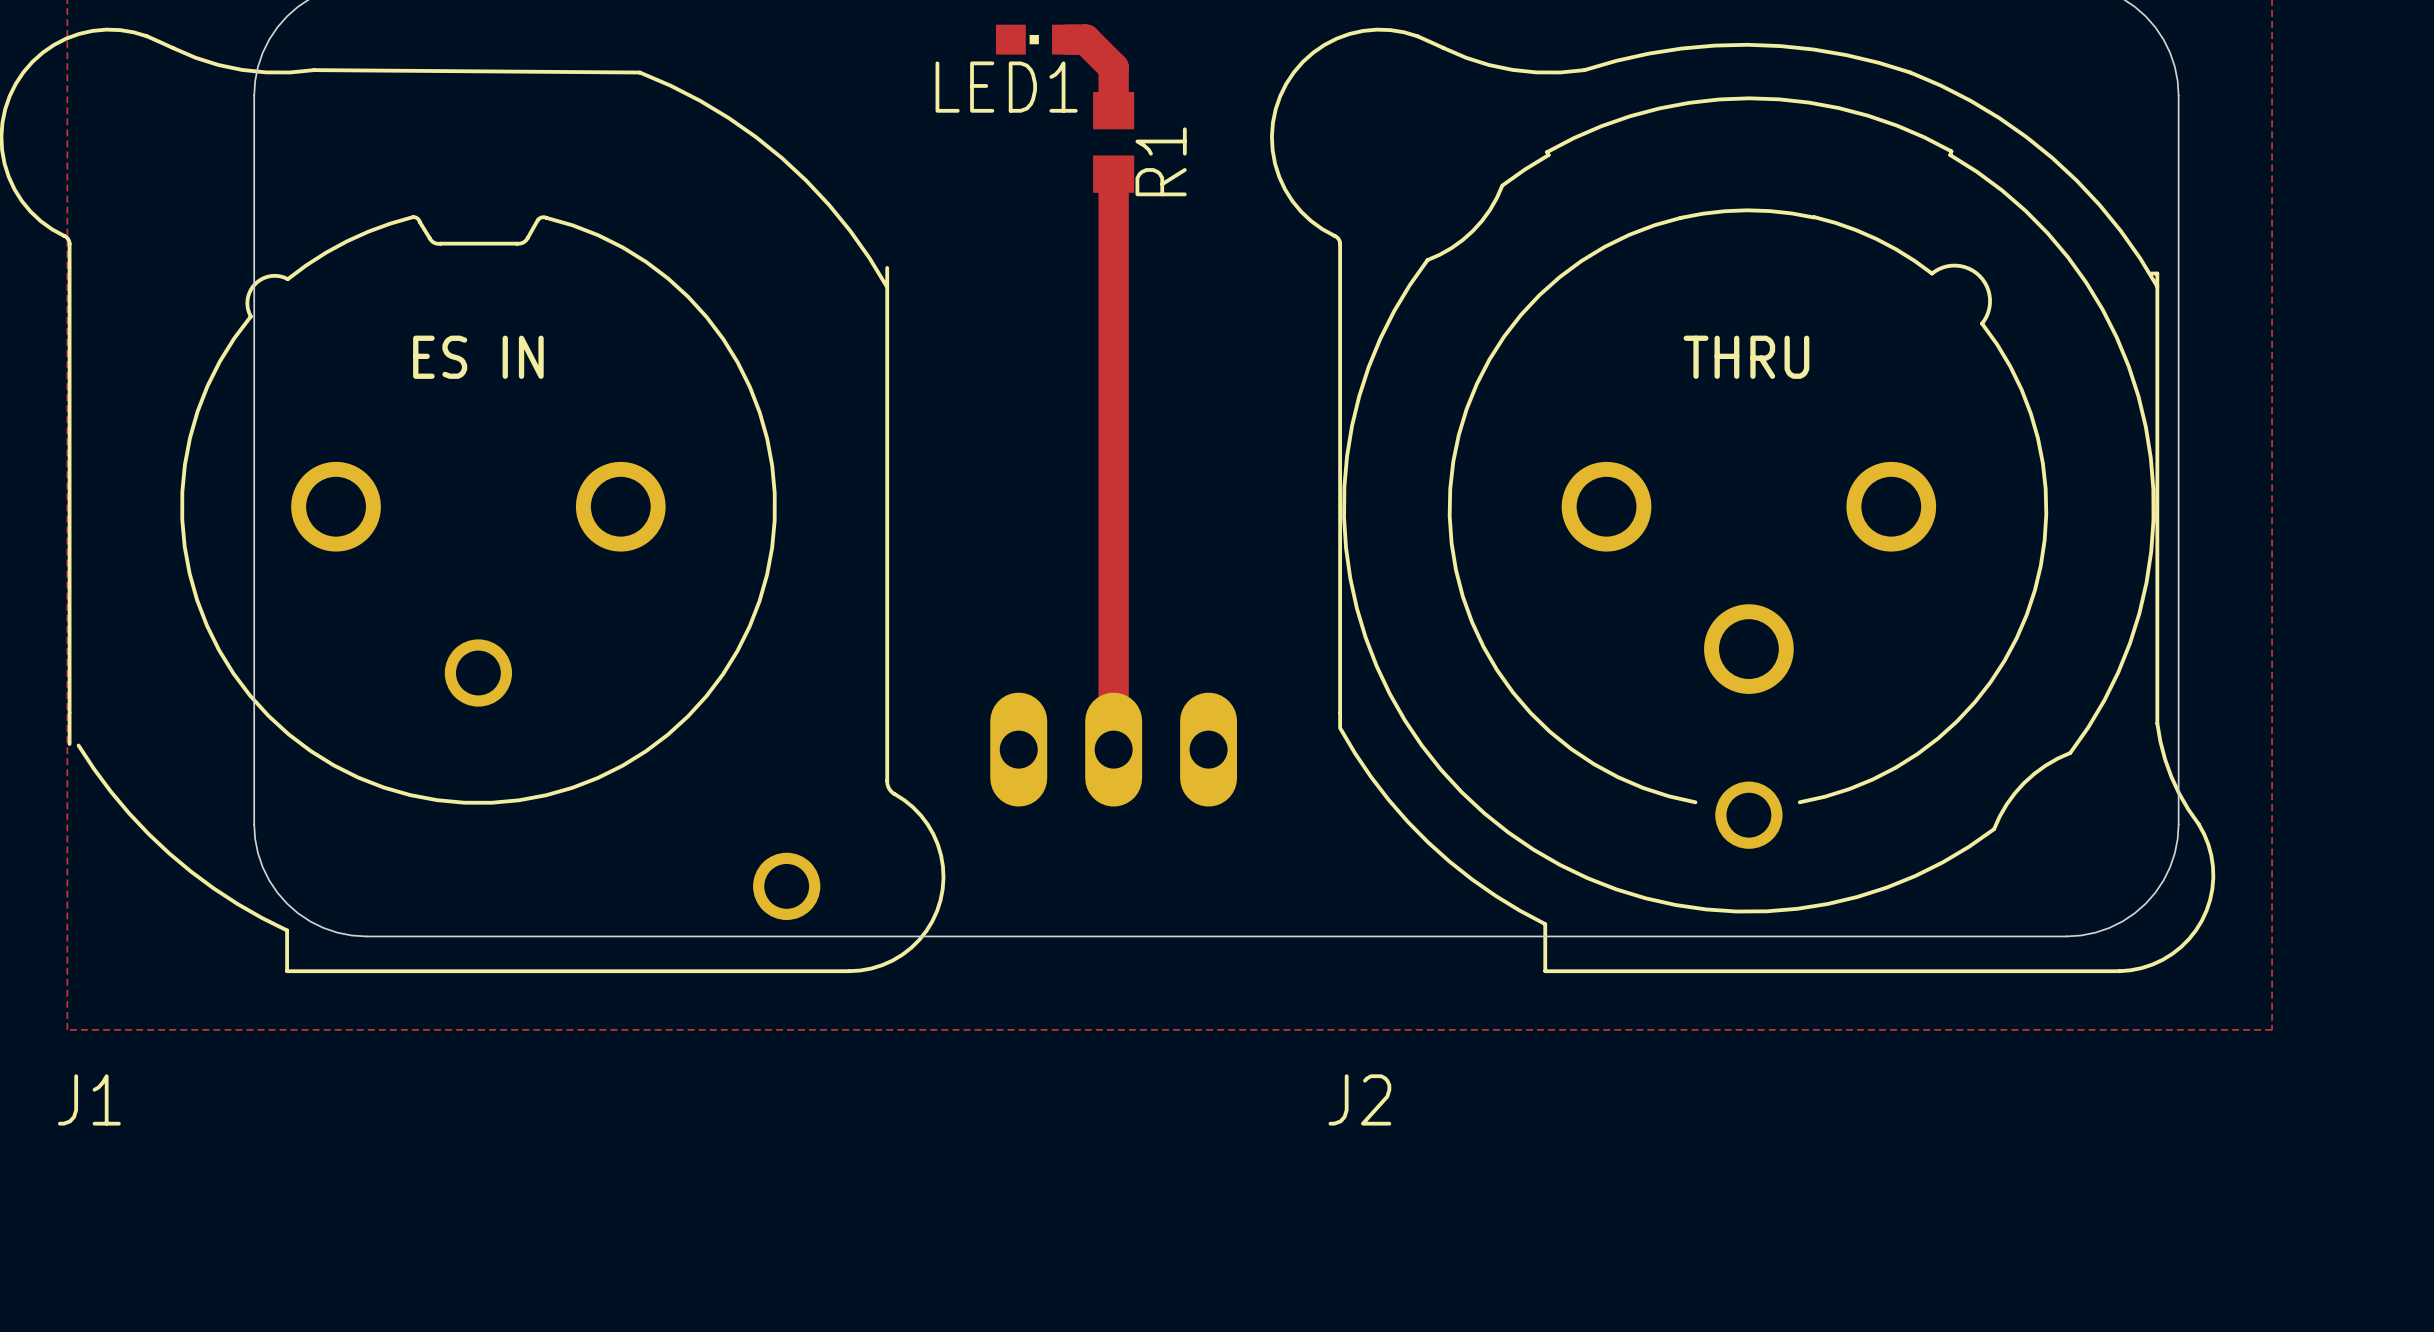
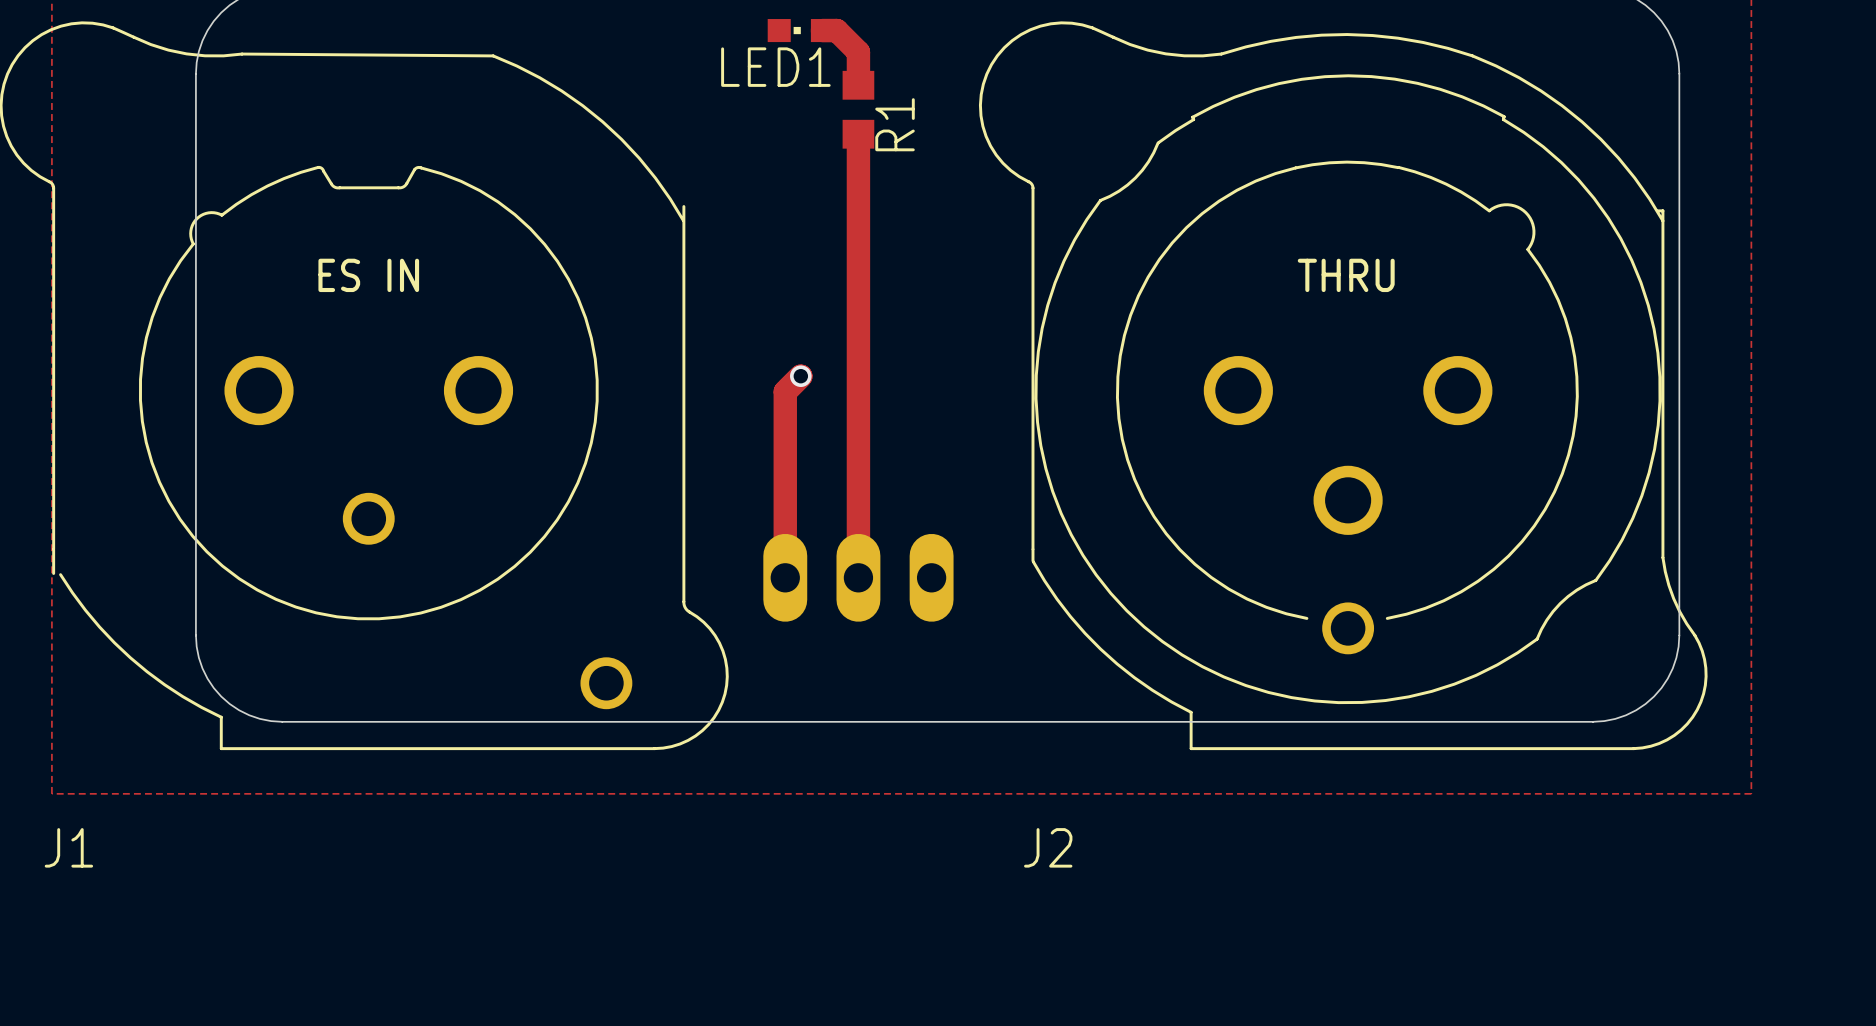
track: none -> (800, 376) (785, 391) (785, 577)
via: none -> (800, 376)

